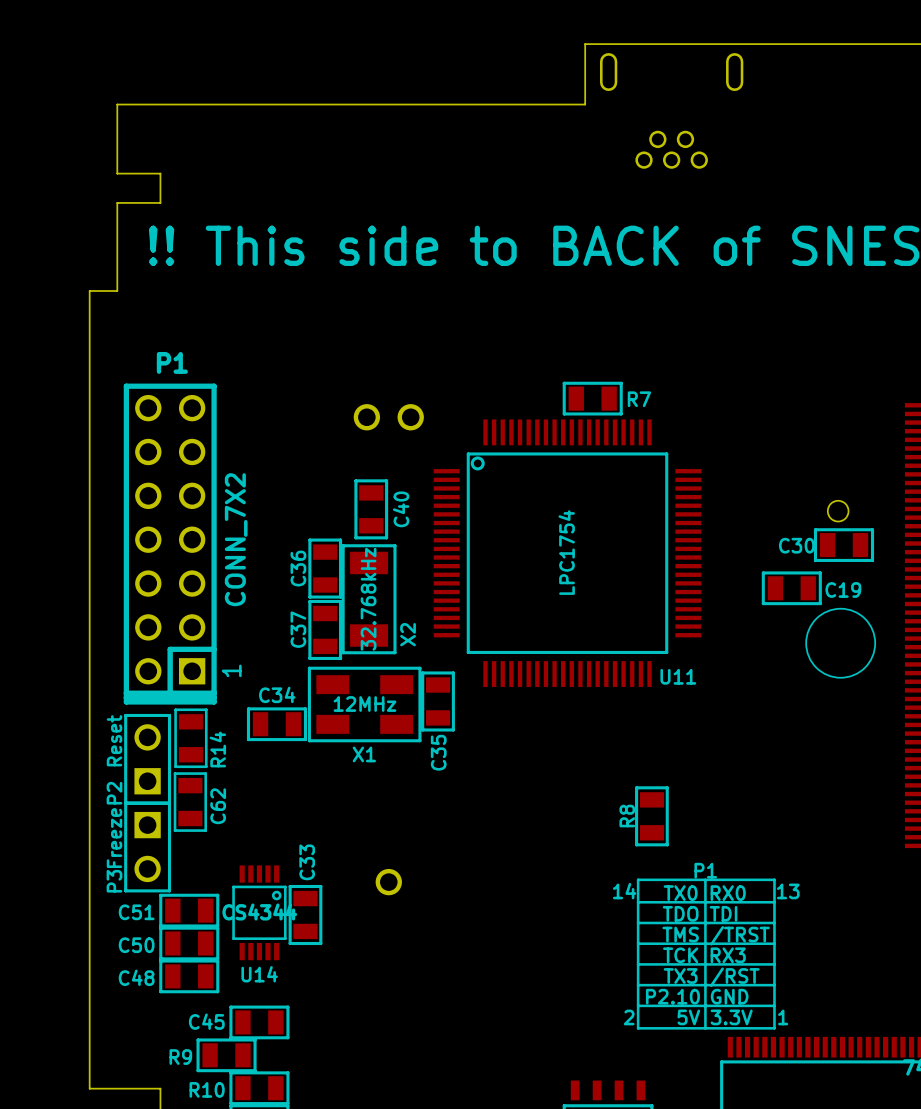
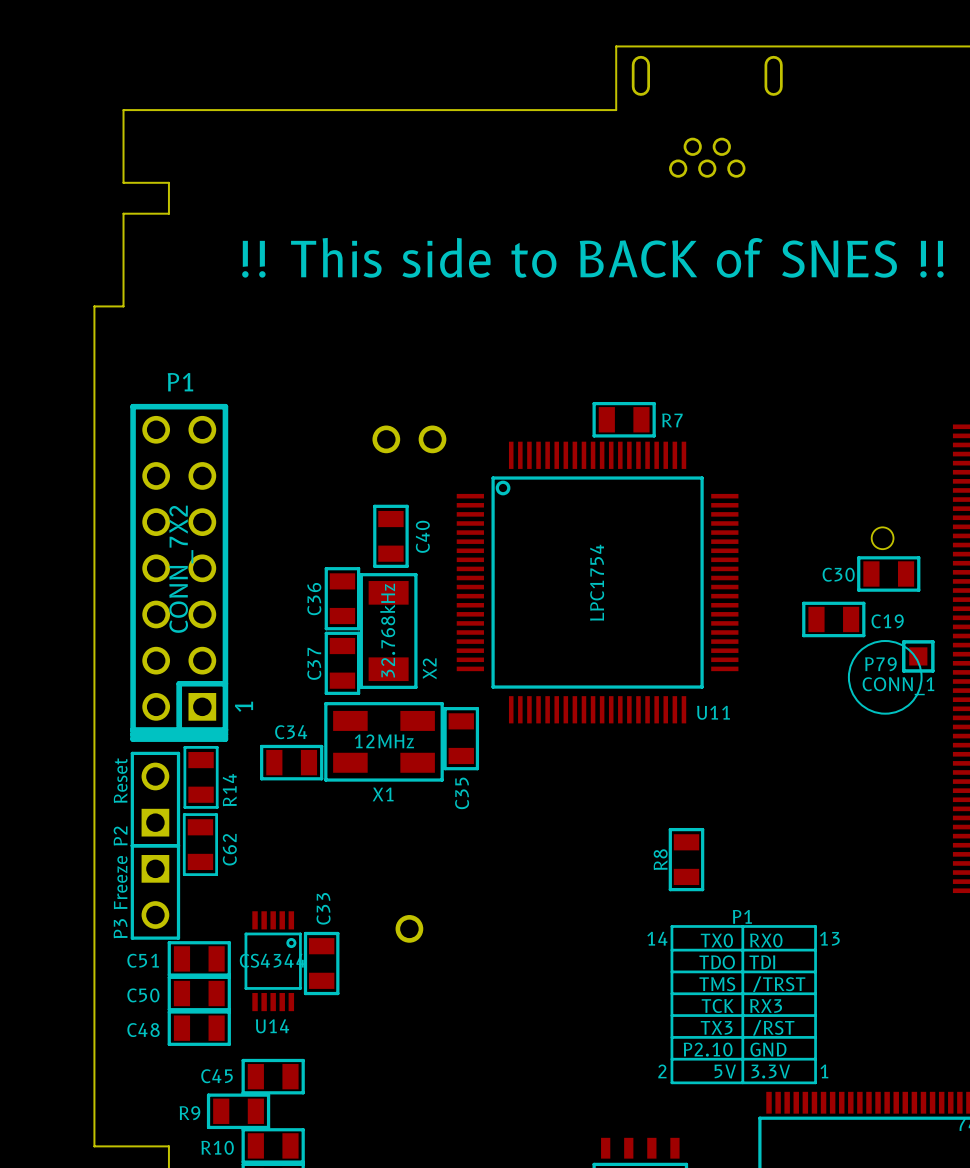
P1 value position: CONN_7X2 (236, 539) -> CONN_7X2 (181, 569)
P79: none -> CONN_1 (918, 656)

